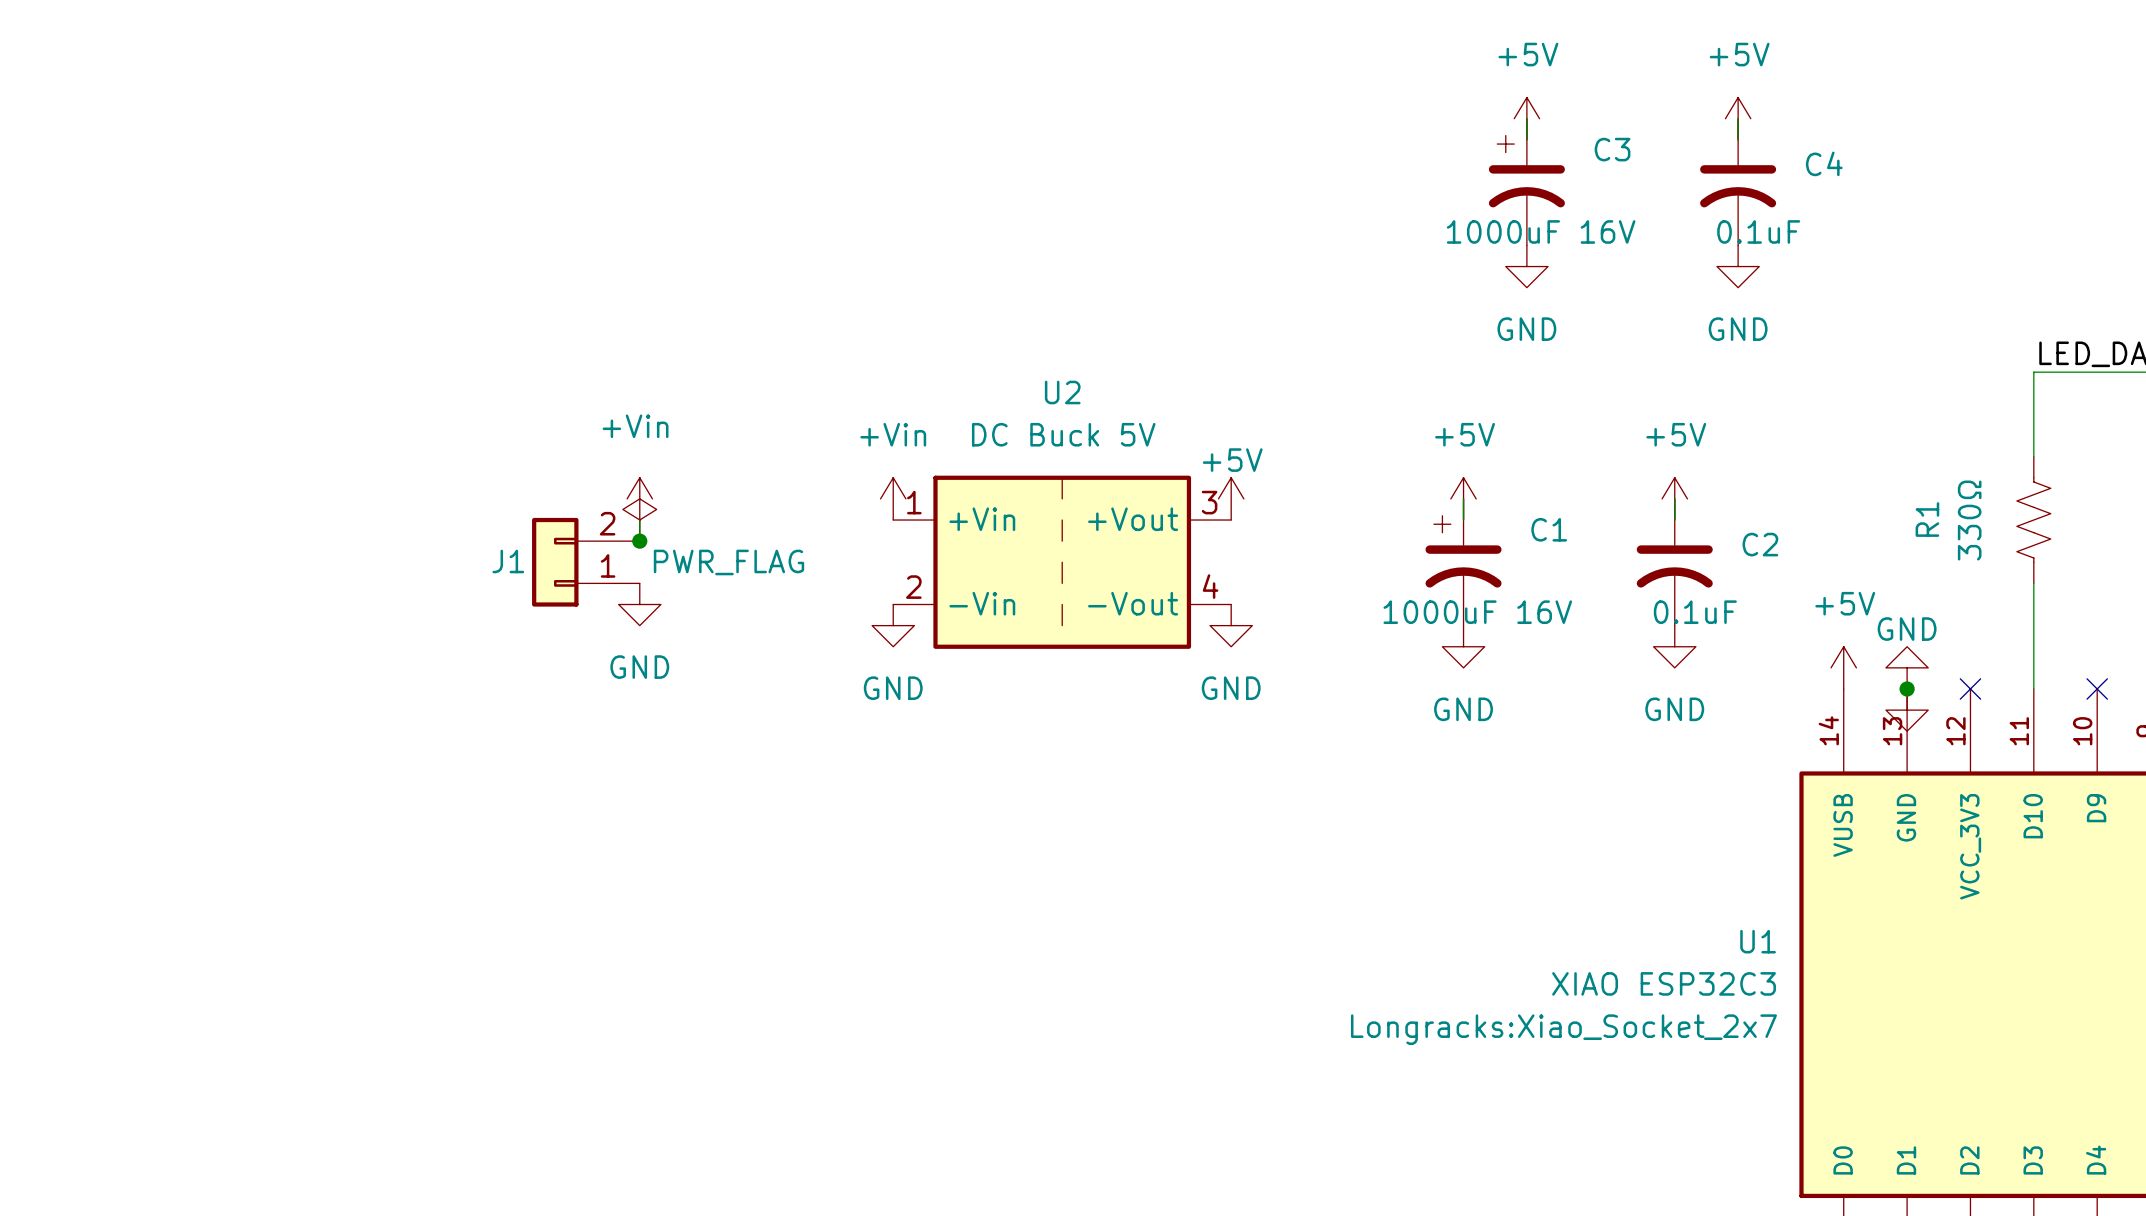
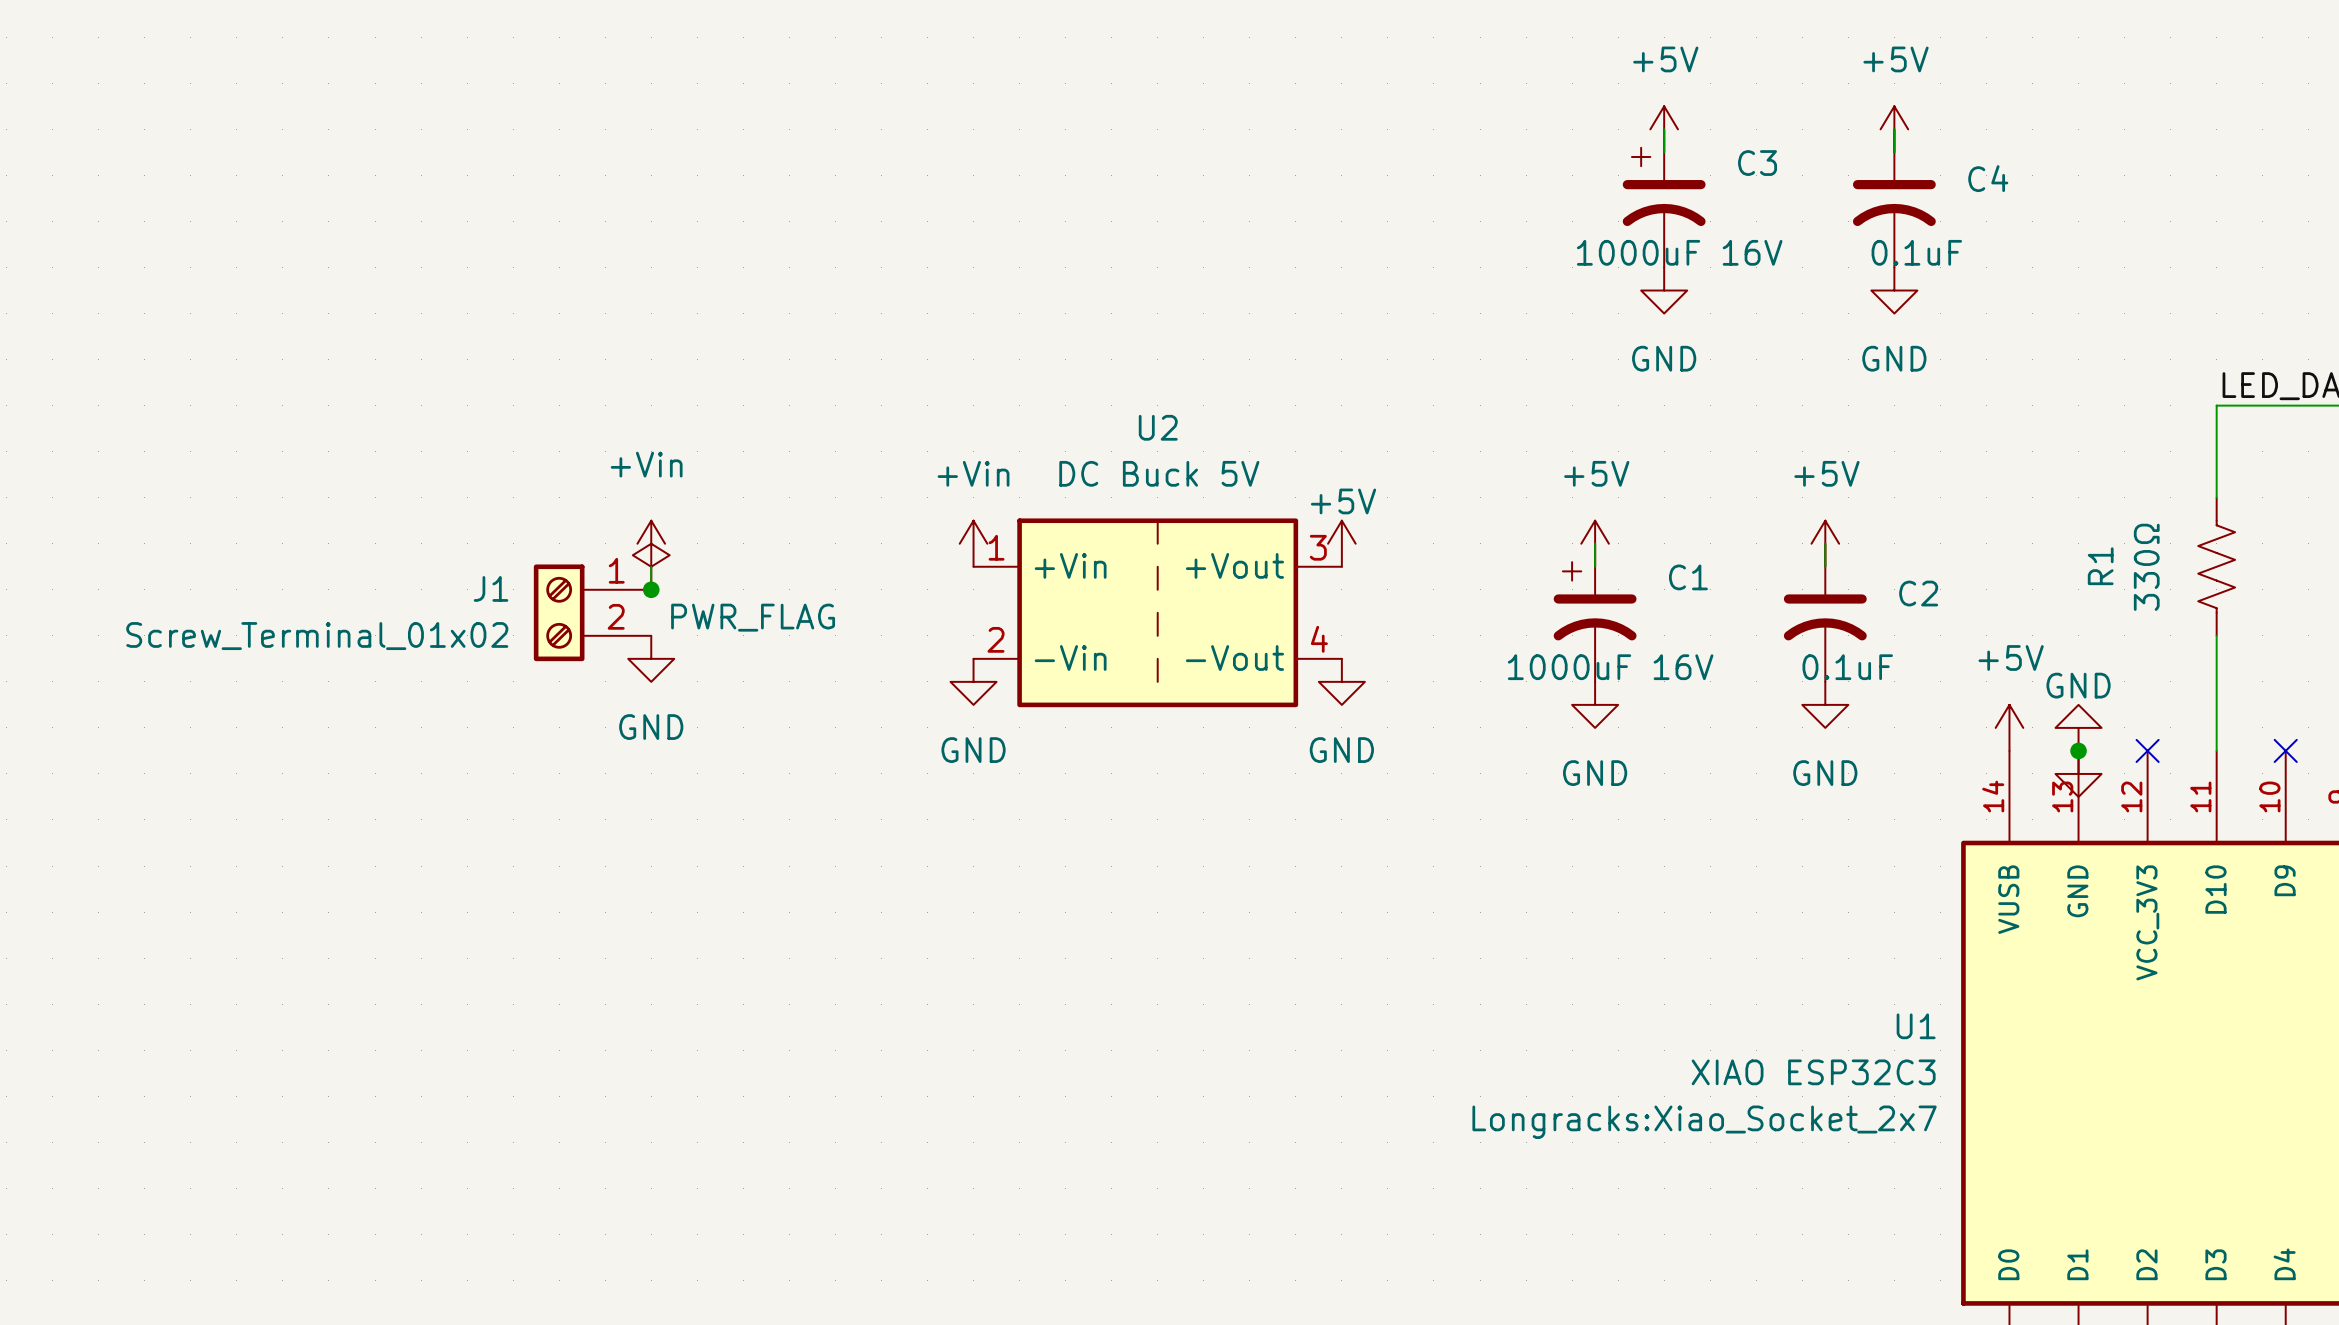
power symbol position: +Vin (639, 498) -> +Vin (651, 543)
J1 symbol: [532, 517, 640, 607] -> [533, 564, 652, 662]
wire: (639, 520) (639, 541) -> (651, 566) (651, 589)
power symbol position: PWR_FLAG (639, 520) -> PWR_FLAG (651, 566)
junction position: (639, 541) -> (651, 589)
power symbol text position: PWR_FLAG (728, 562) -> PWR_FLAG (753, 617)
J1 value: none -> Screw_Terminal_01x02 (317, 636)
power symbol position: GND (639, 604) -> GND (651, 658)

